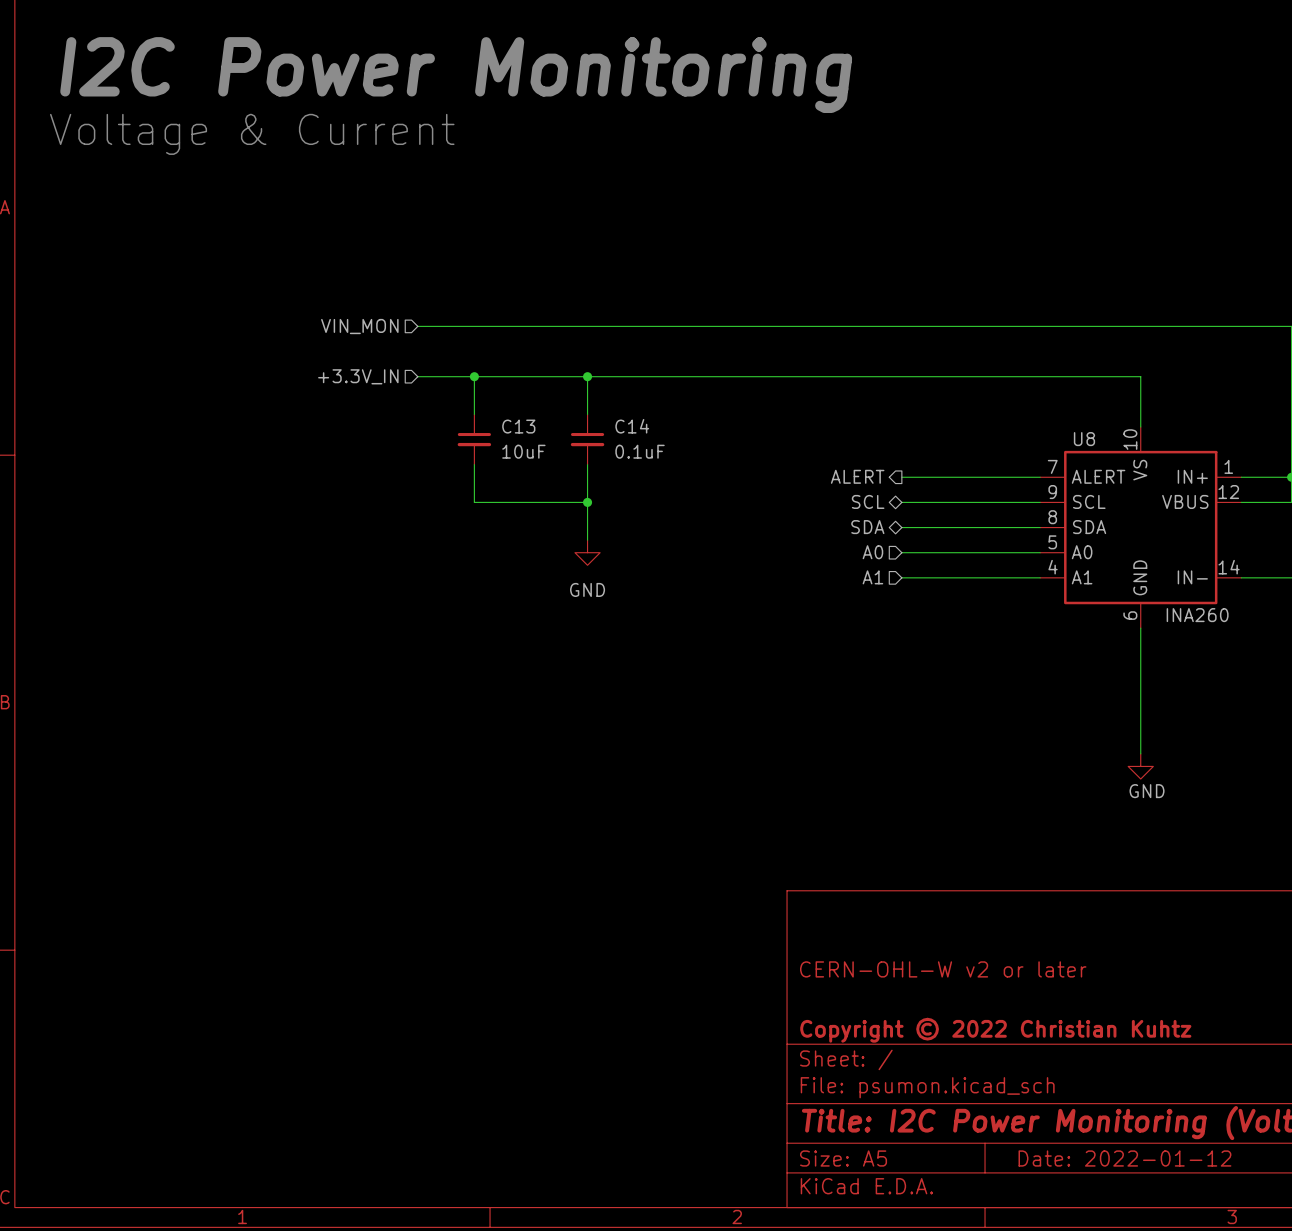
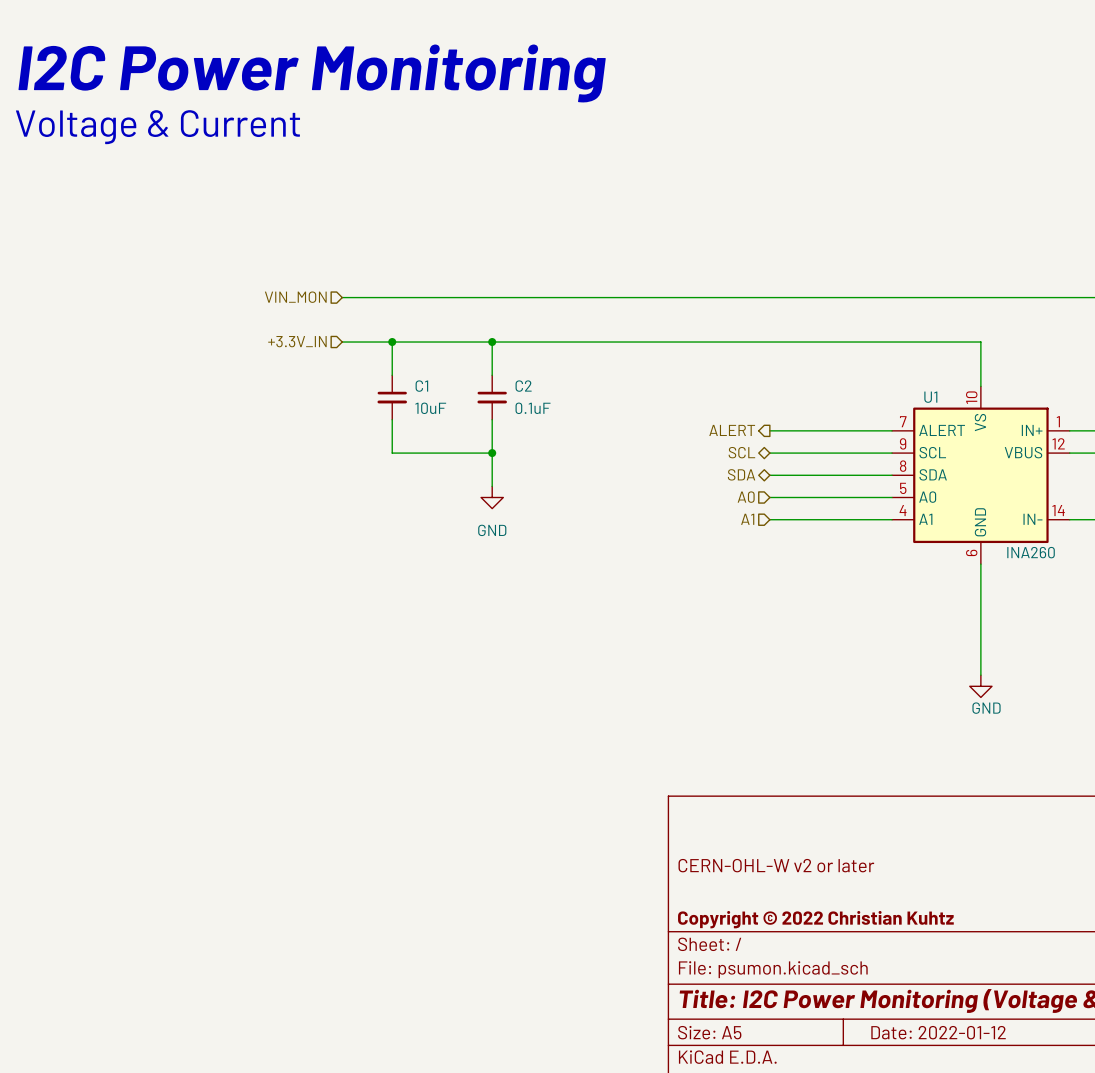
C13 name: C13 (518, 426) -> C1 (421, 386)
C14 name: C14 (632, 426) -> C2 (523, 386)
U8 name: U8 (1084, 439) -> U1 (930, 397)

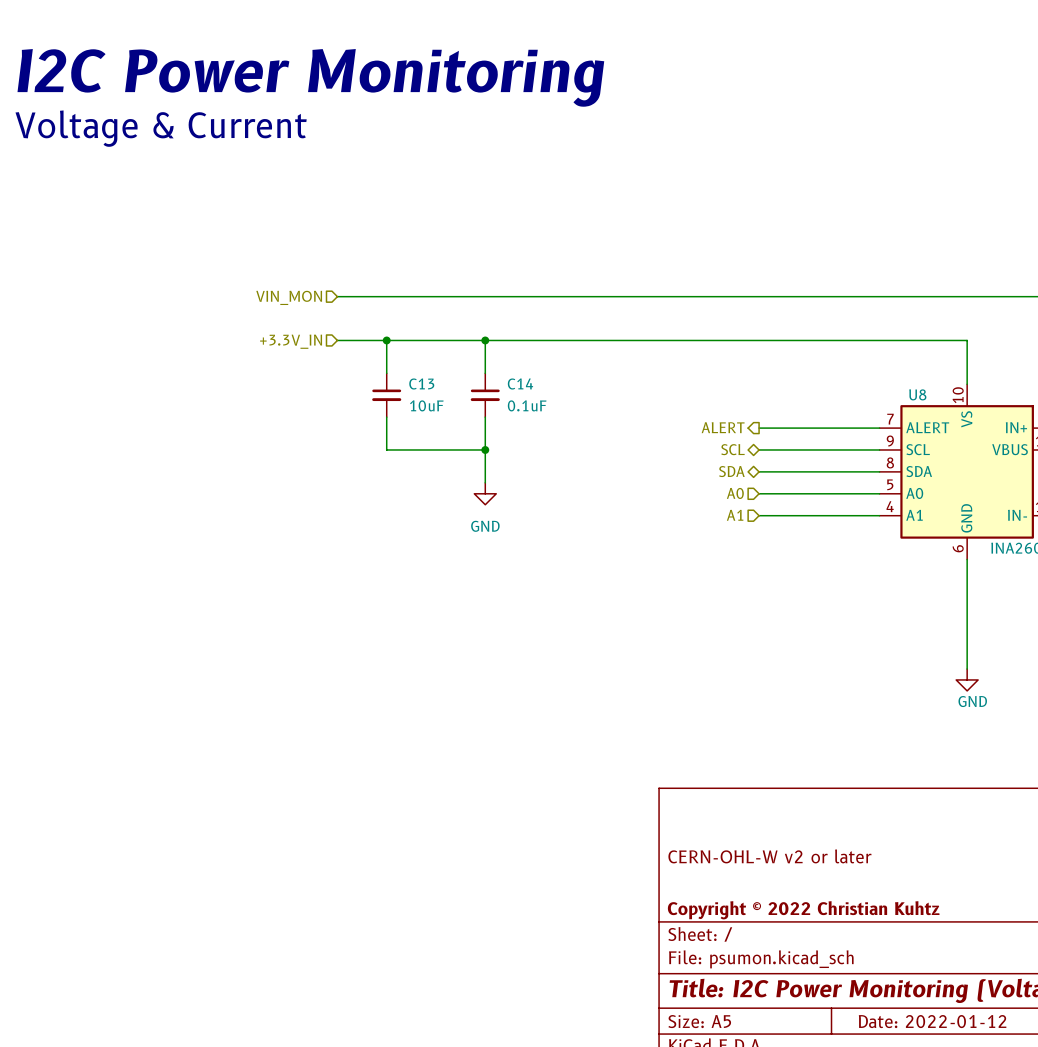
C1 name: C1 (421, 386) -> C13 (421, 383)
C2 name: C2 (523, 386) -> C14 (520, 383)
U1 name: U1 (930, 397) -> U8 (917, 394)

